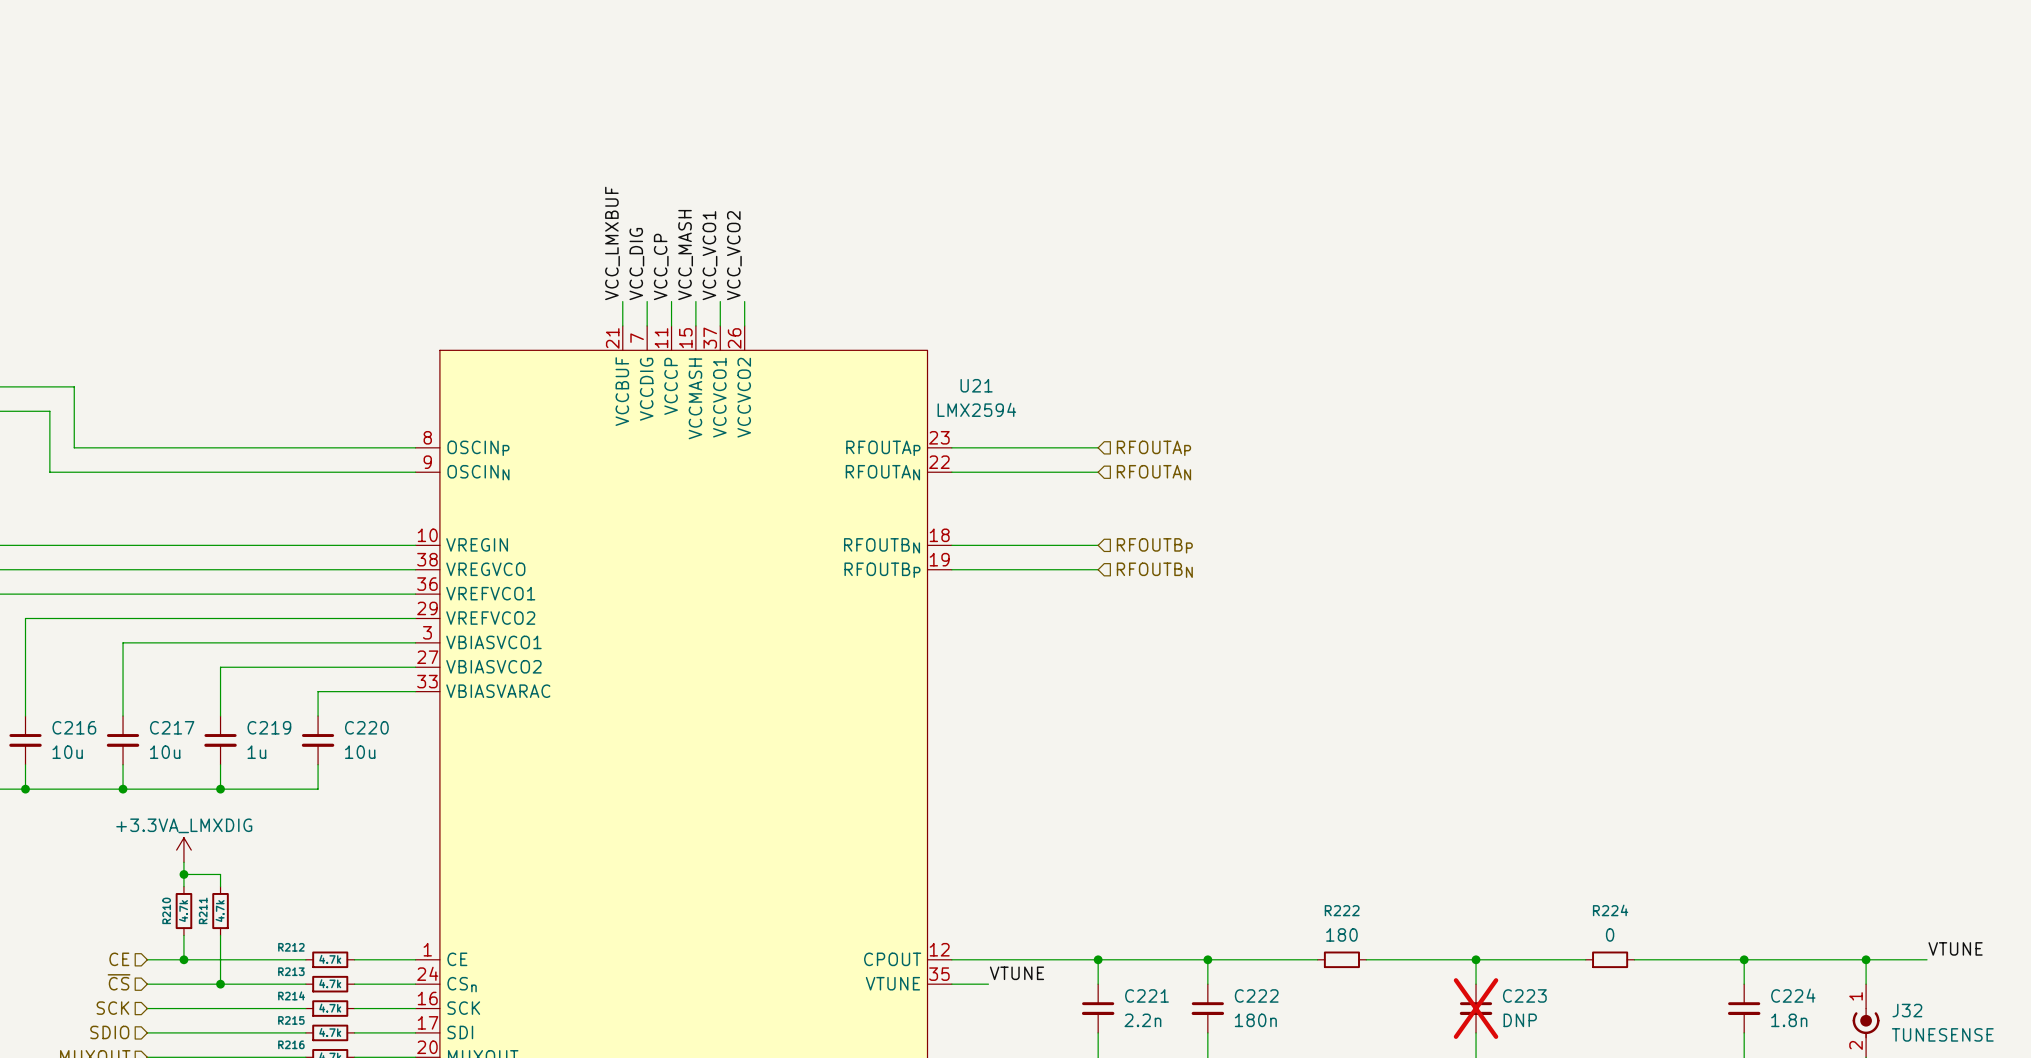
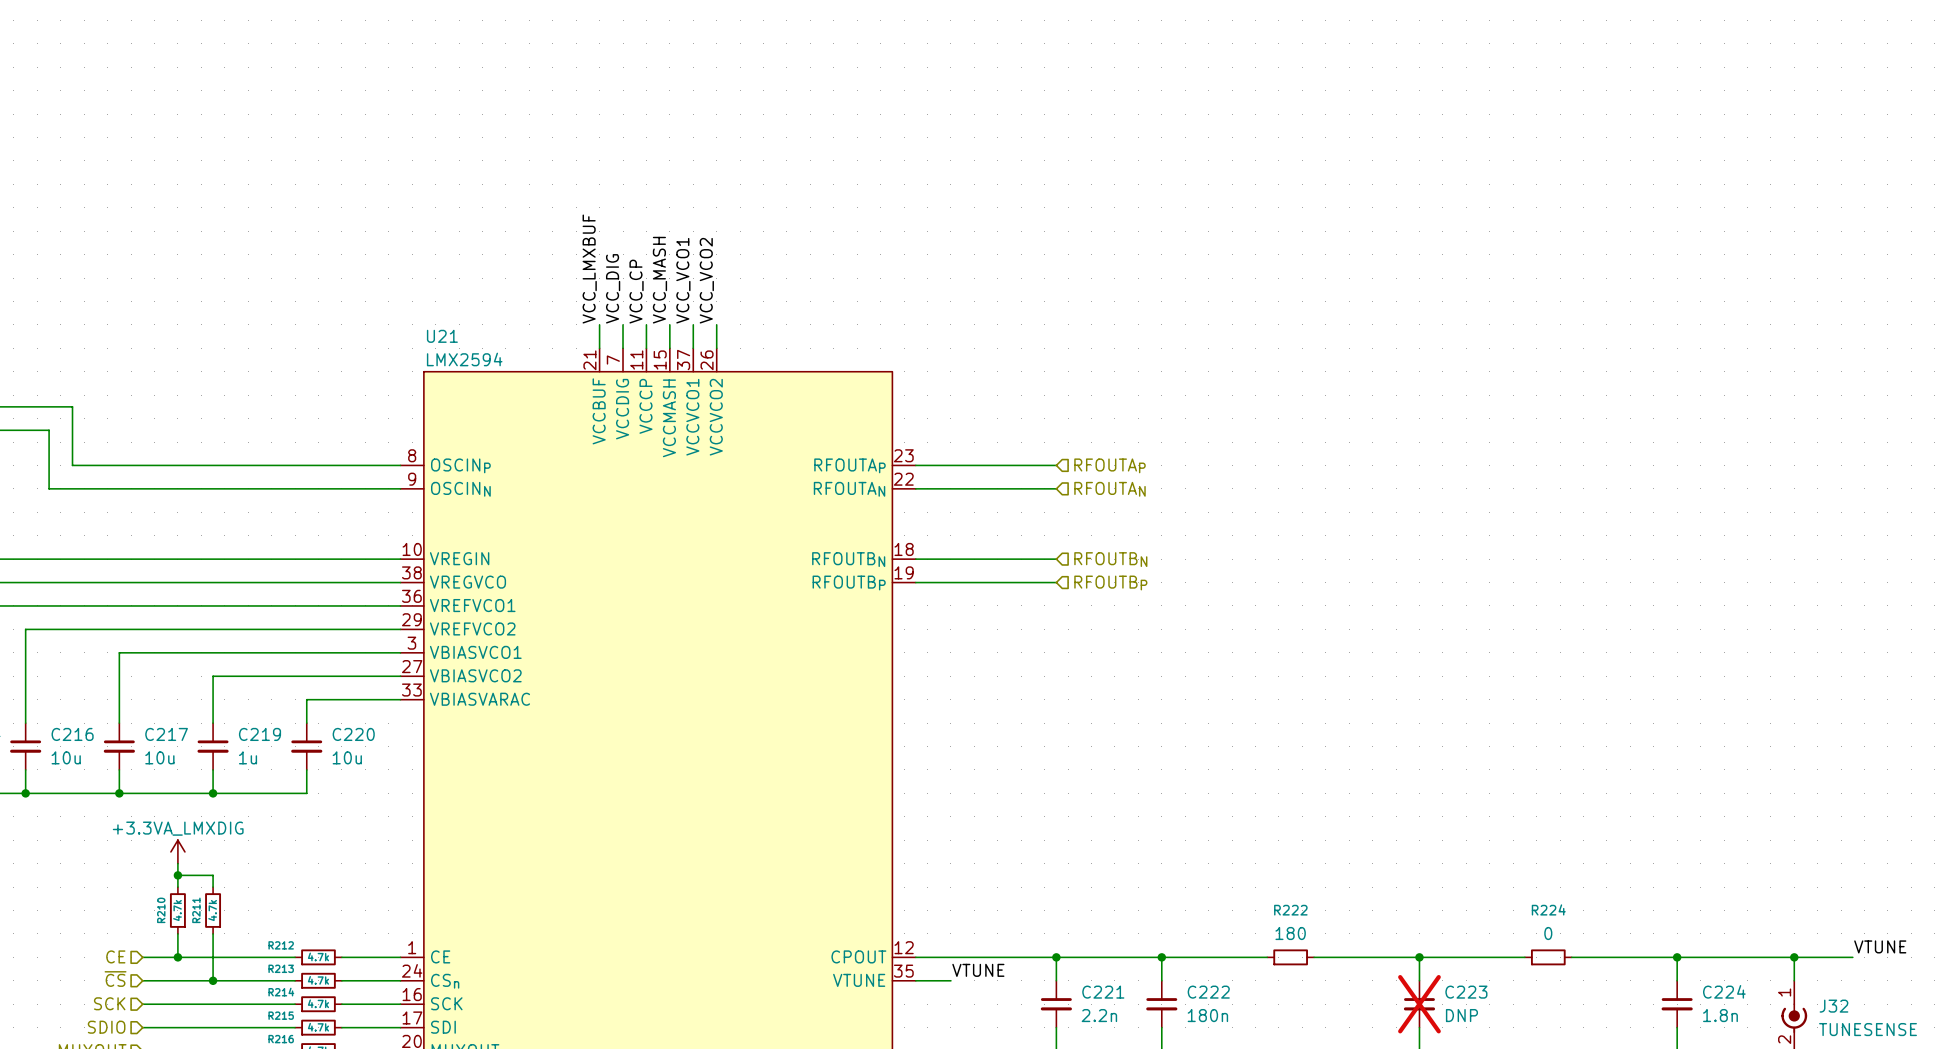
U21 name position: U21 (976, 385) -> U21 (442, 336)
U21 value position: LMX2594 (976, 409) -> LMX2594 (464, 359)
hierarchical label: RFOUTBP (1154, 545) -> RFOUTBN (1110, 559)
hierarchical label: RFOUTBN (1154, 570) -> RFOUTBP (1110, 583)

